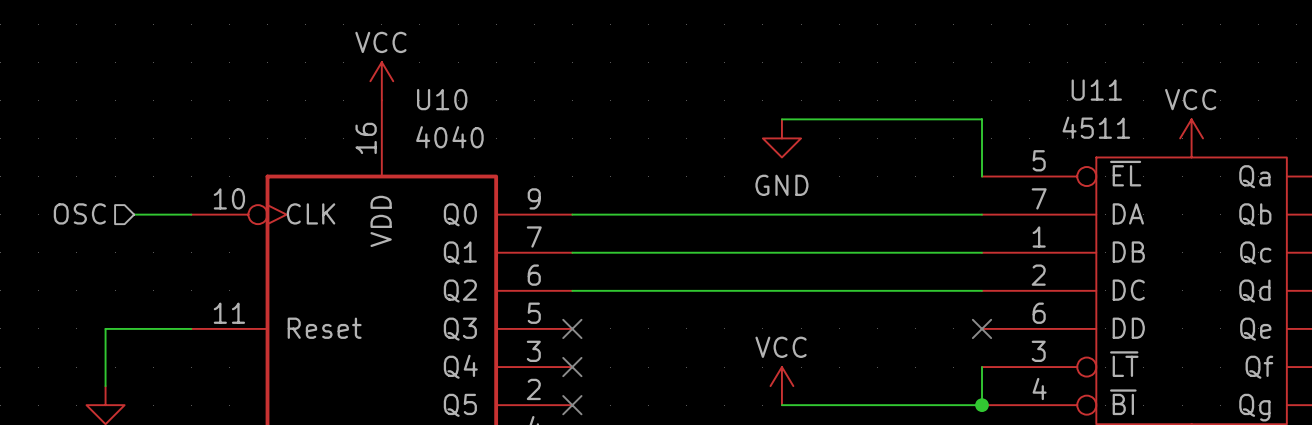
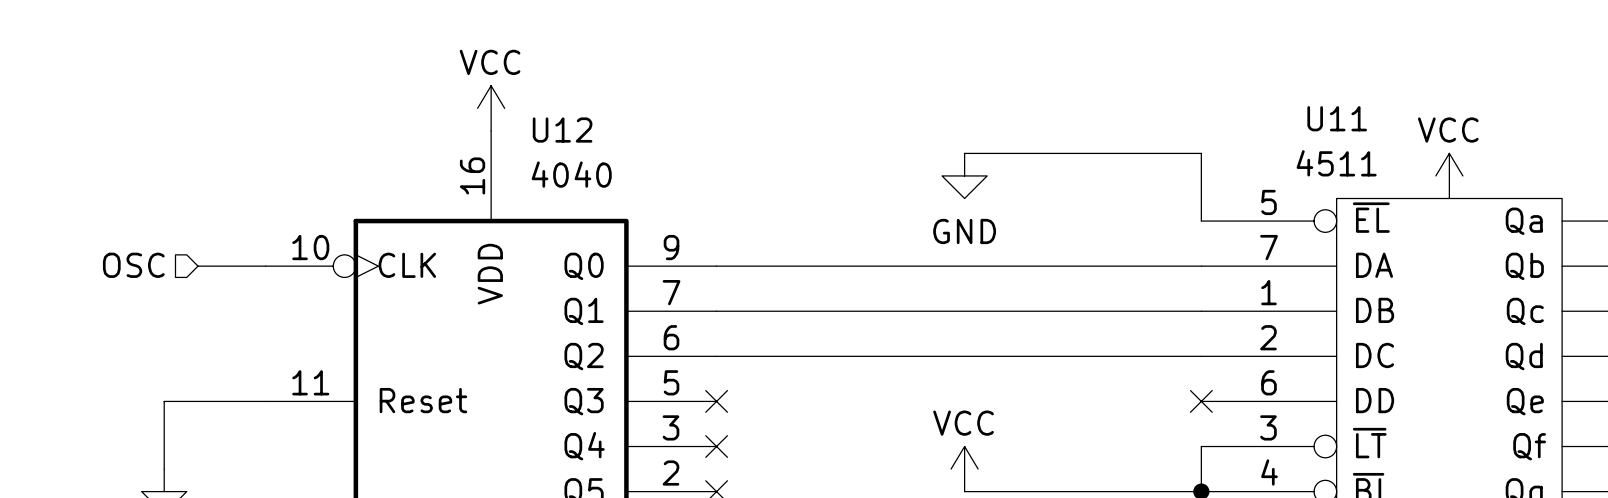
U10 name: U10 (442, 99) -> U12 (562, 130)

